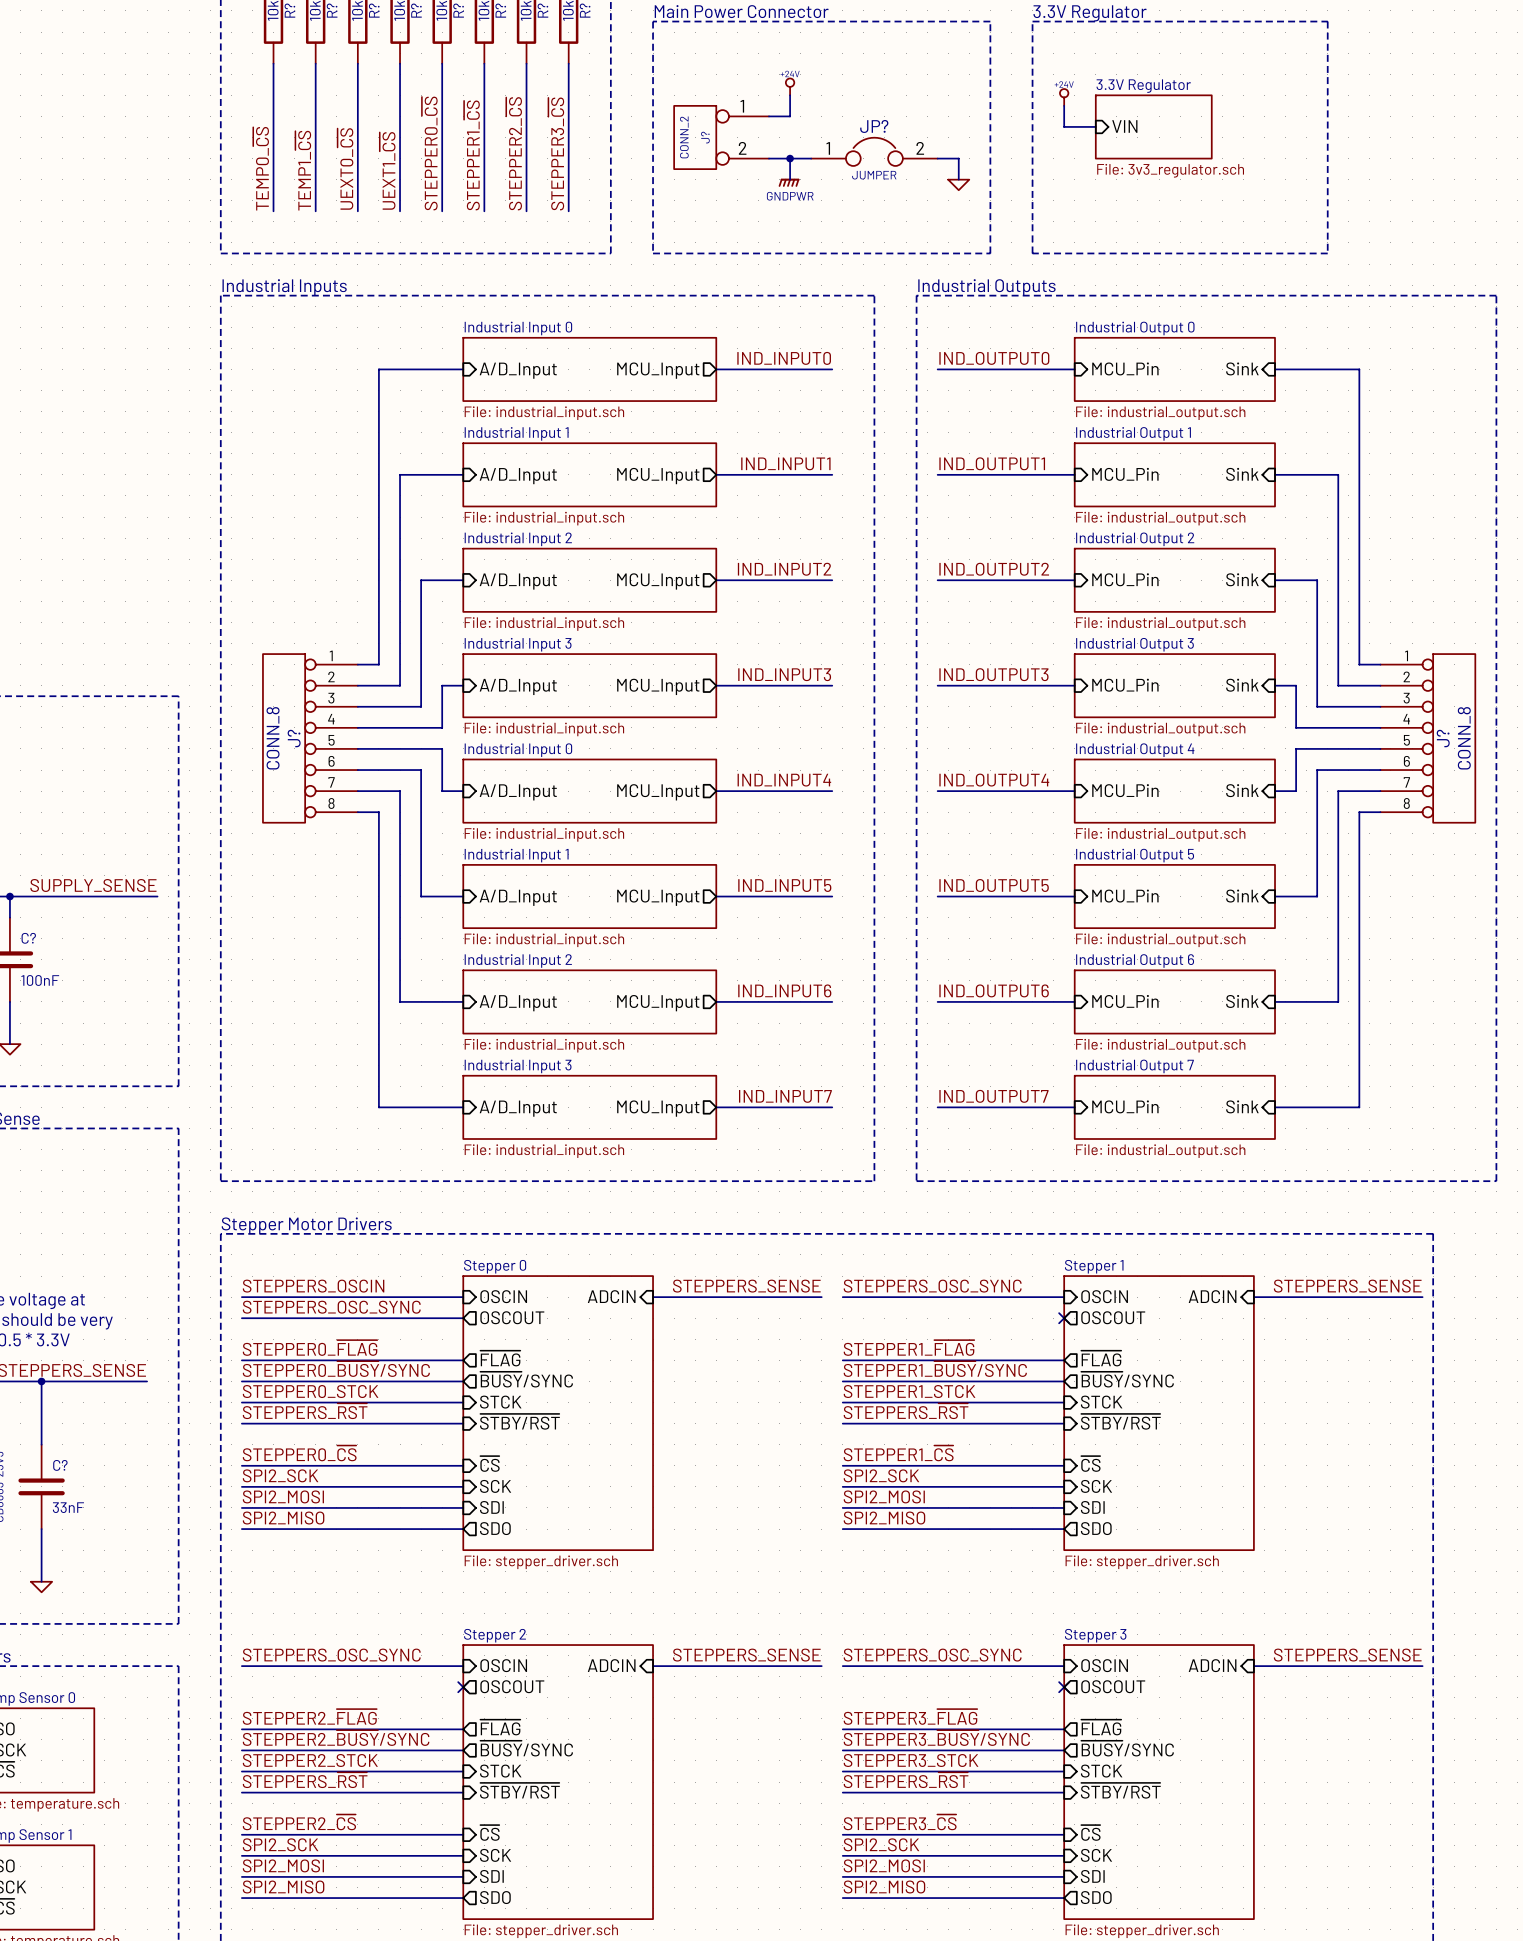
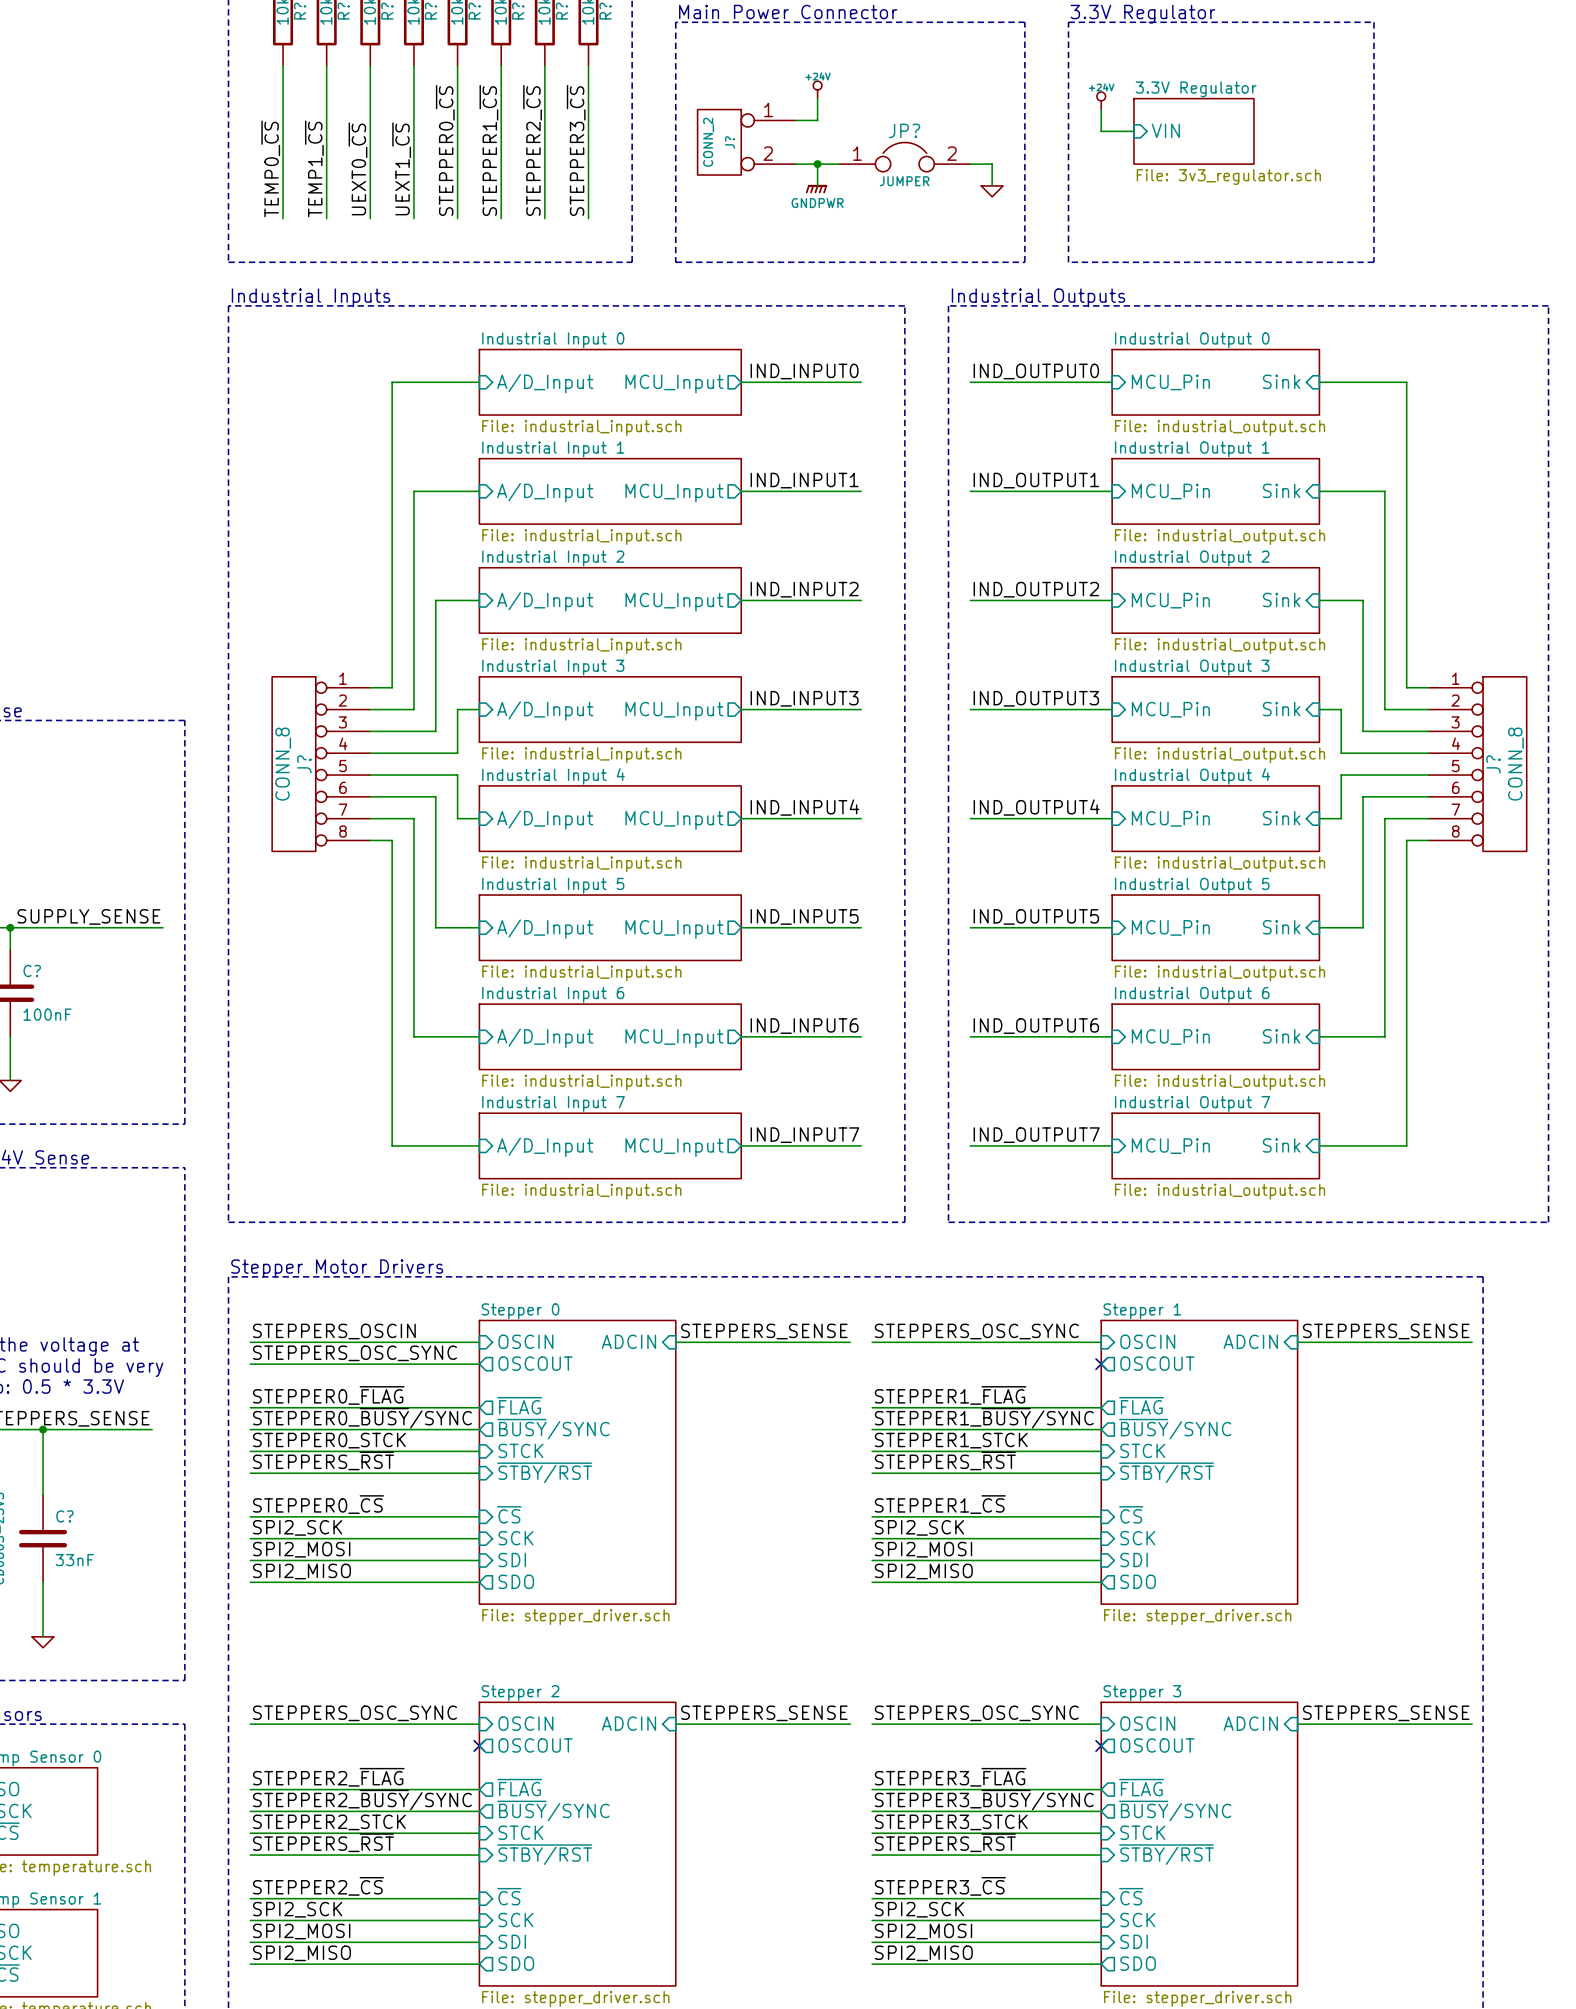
sheet Industrial Input 0 name: Industrial Input 0 (518, 750) -> Industrial Input 4 (553, 776)
sheet Industrial Input 1 name: Industrial Input 1 (516, 855) -> Industrial Input 5 (553, 885)
sheet Industrial Input 2 name: Industrial Input 2 (518, 961) -> Industrial Input 6 (553, 994)
sheet Industrial Input 3 name: Industrial Input 3 (518, 1066) -> Industrial Input 7 (553, 1103)

